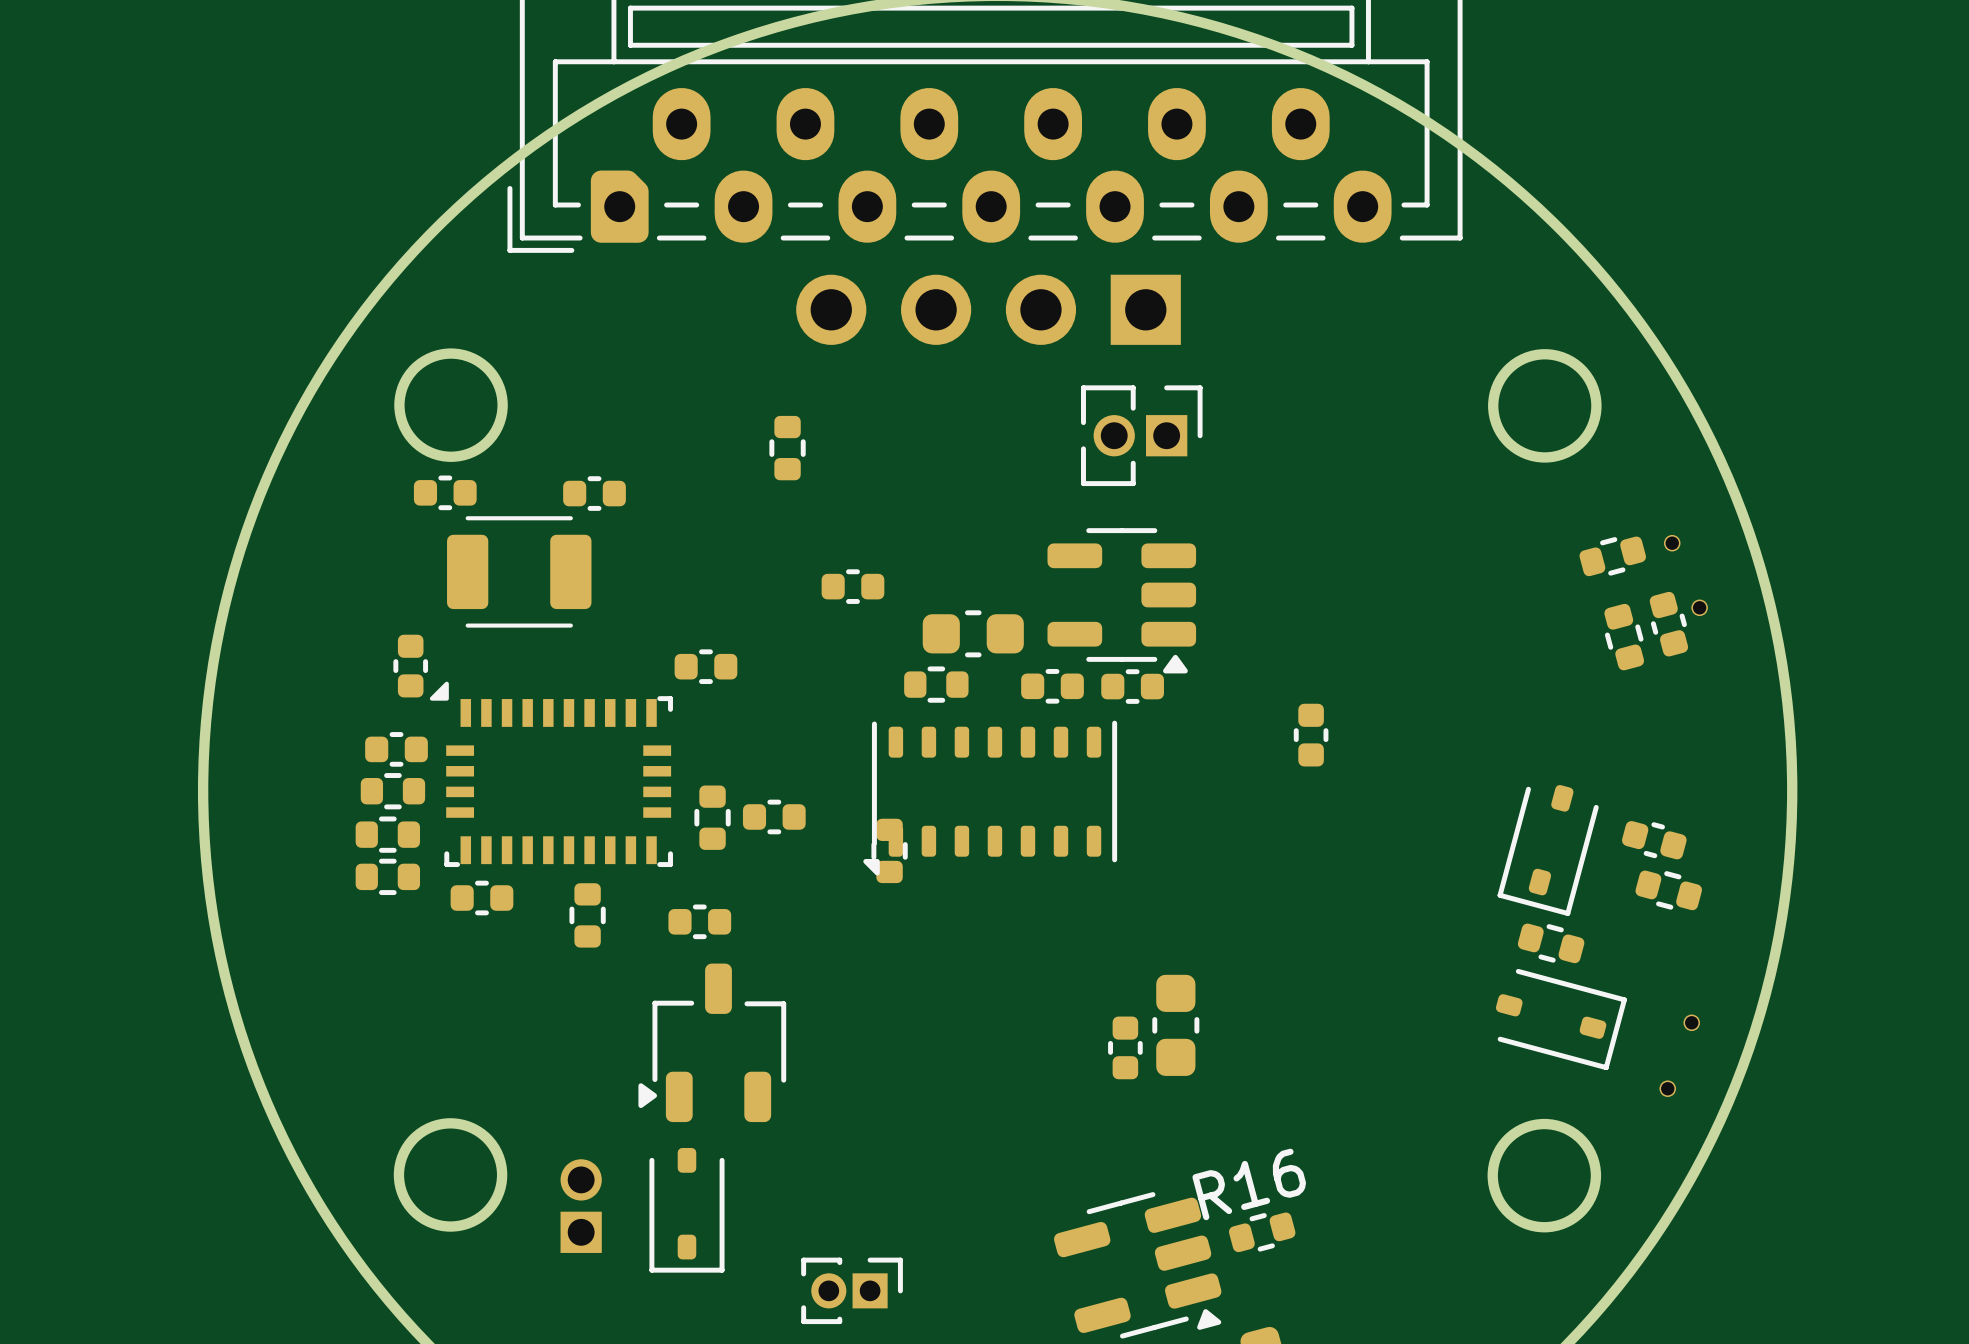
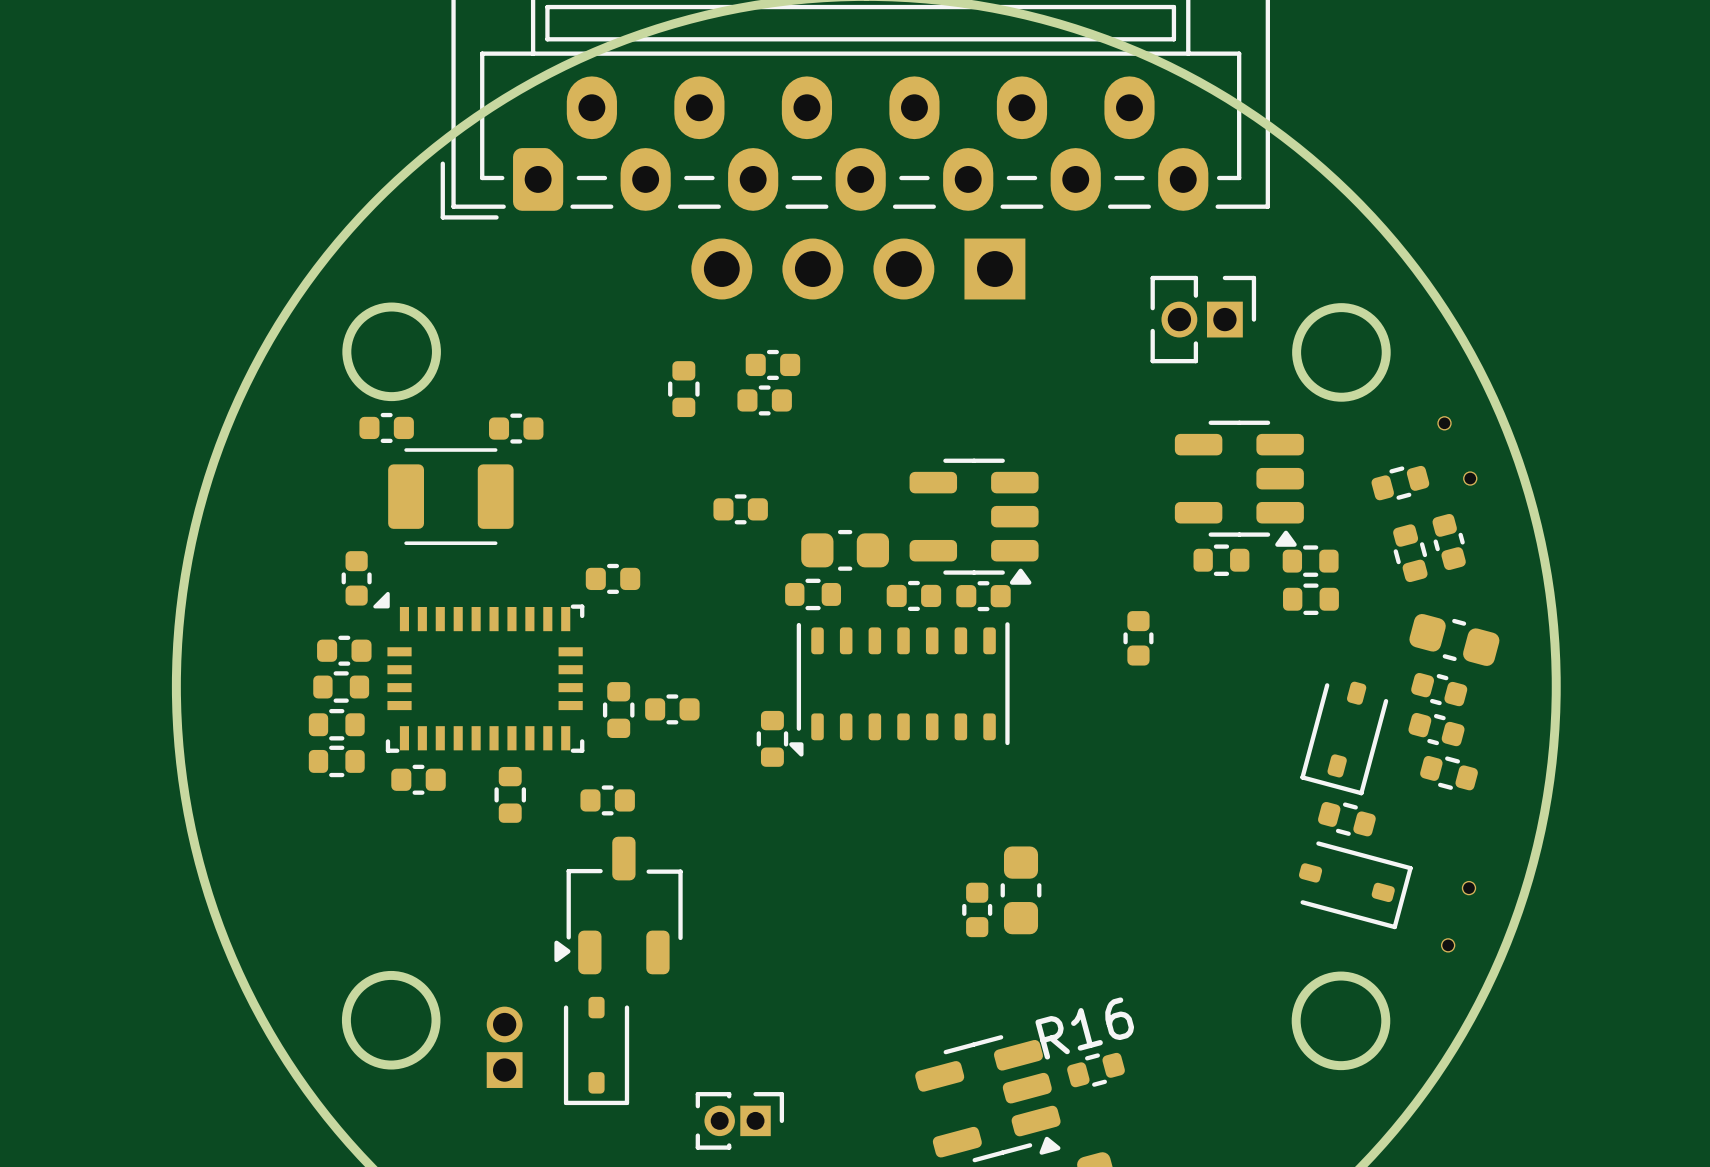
part: none -> (772, 364)
part position: (1141, 435) -> (1203, 319)
part: none -> (764, 400)
part: none -> (1457, 450)
part: none -> (1239, 483)
part: (1685, 575) -> none
part: none -> (1221, 560)
part: none -> (1310, 561)
part: none -> (1310, 599)
part: none -> (1454, 639)
part: none -> (1439, 689)
part position: (990, 798) -> (899, 689)

